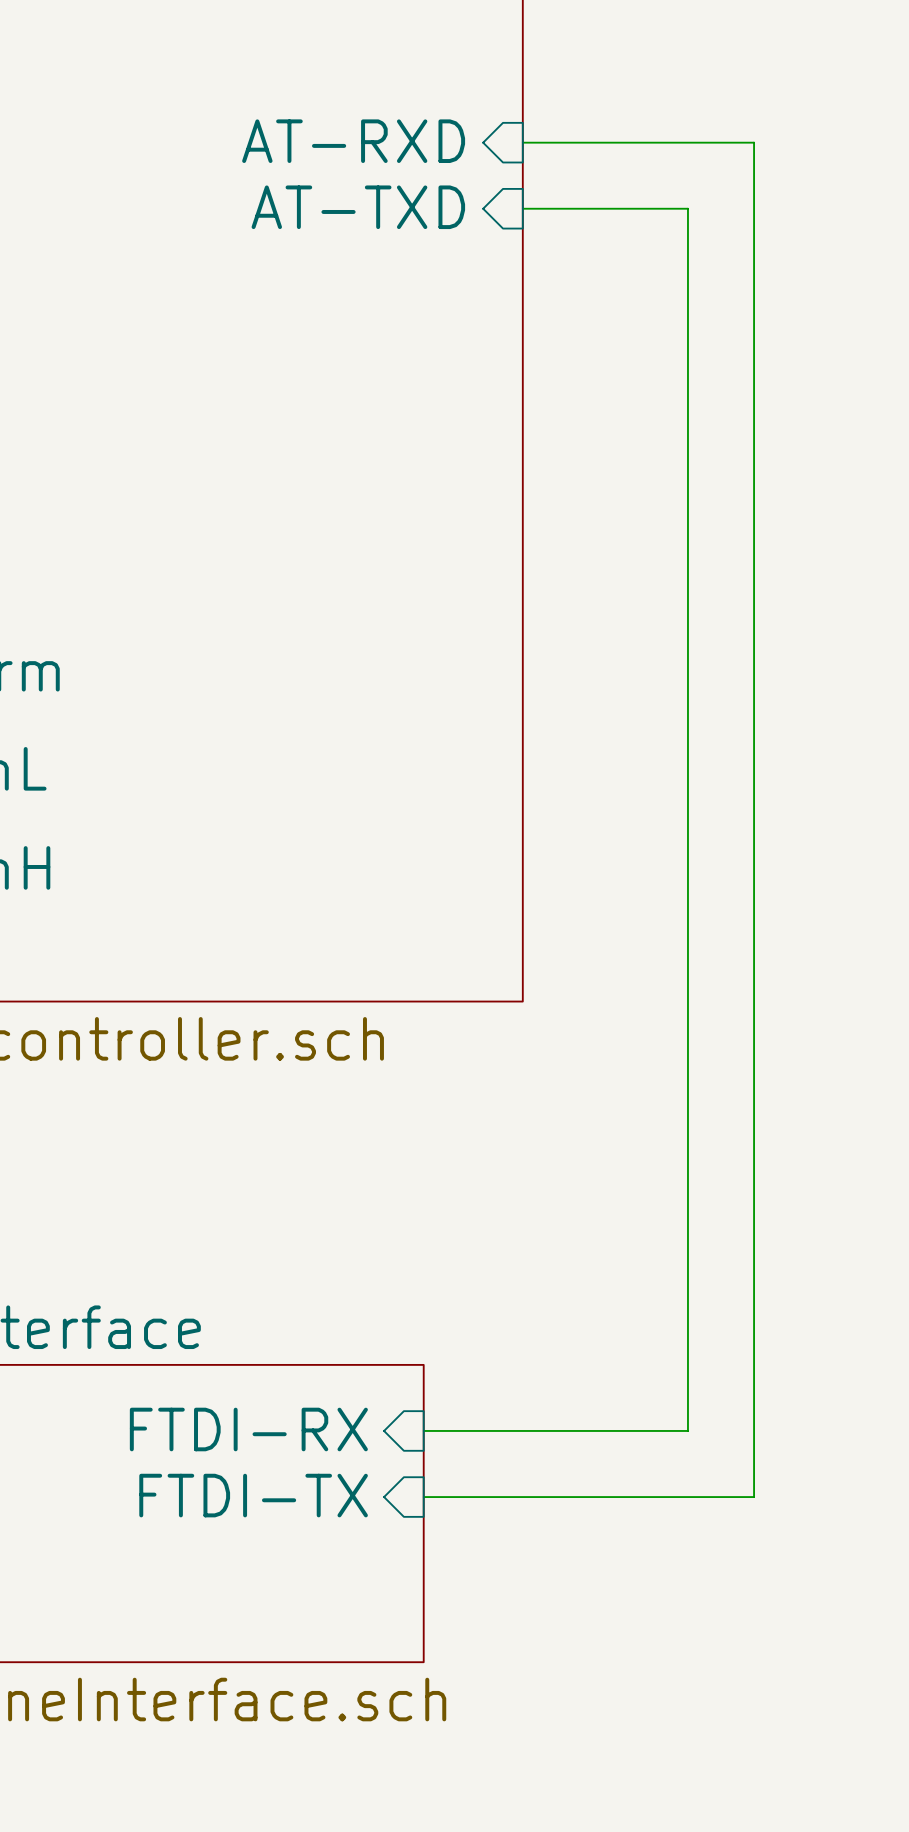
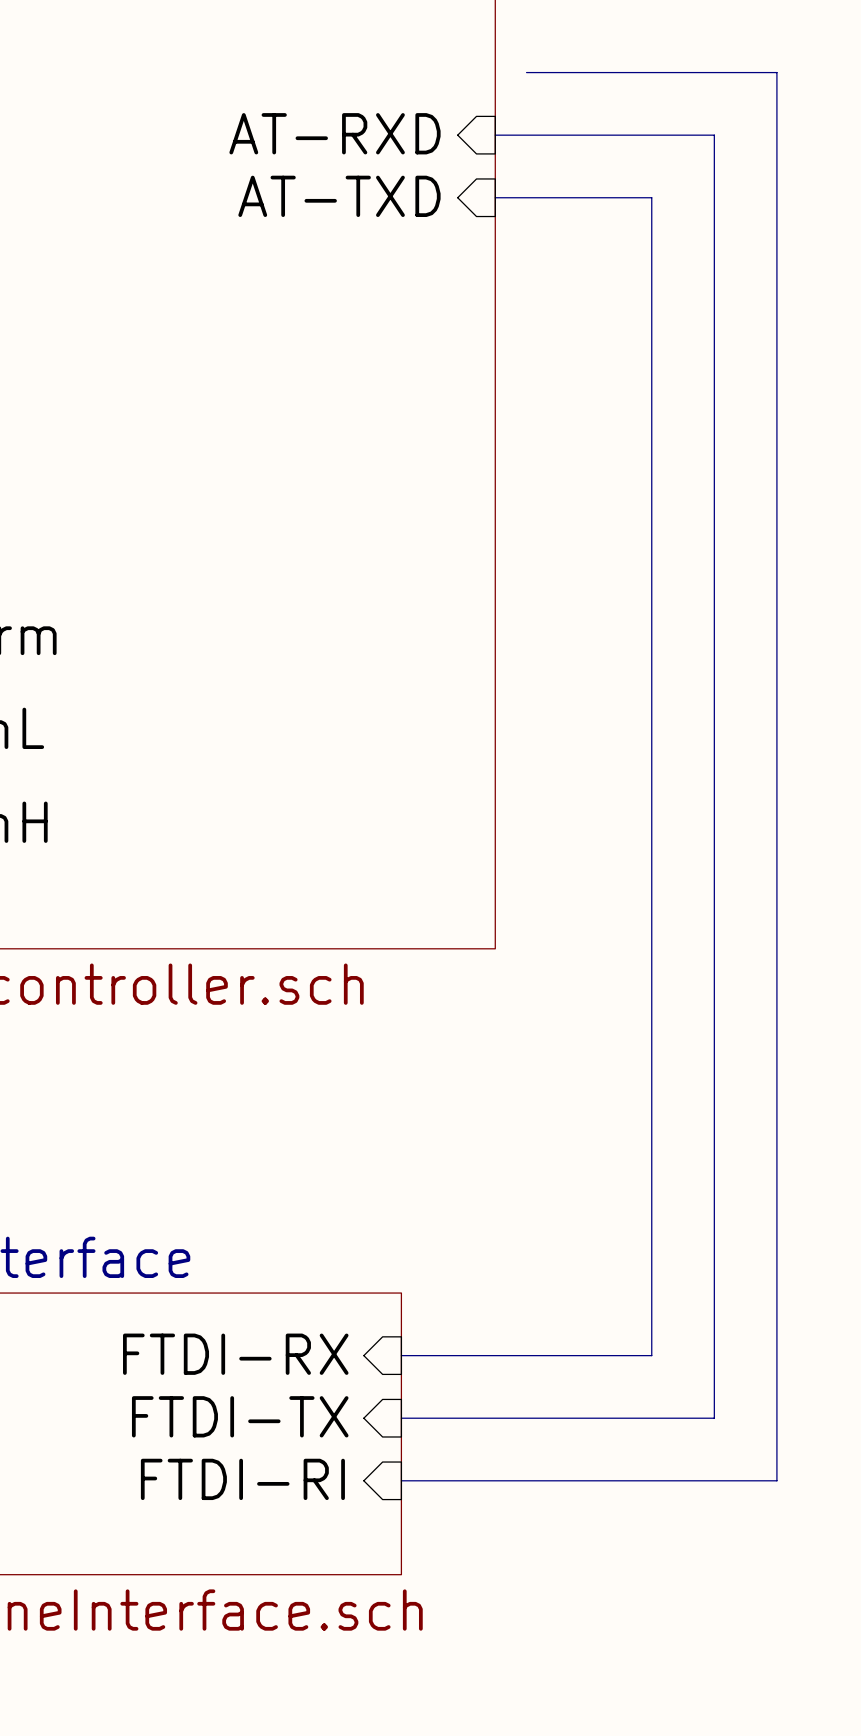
wire: none -> (526, 72) (776, 72) (776, 1480) (401, 1480)
sheet pin: none -> FTDI-RI (242, 1479)

